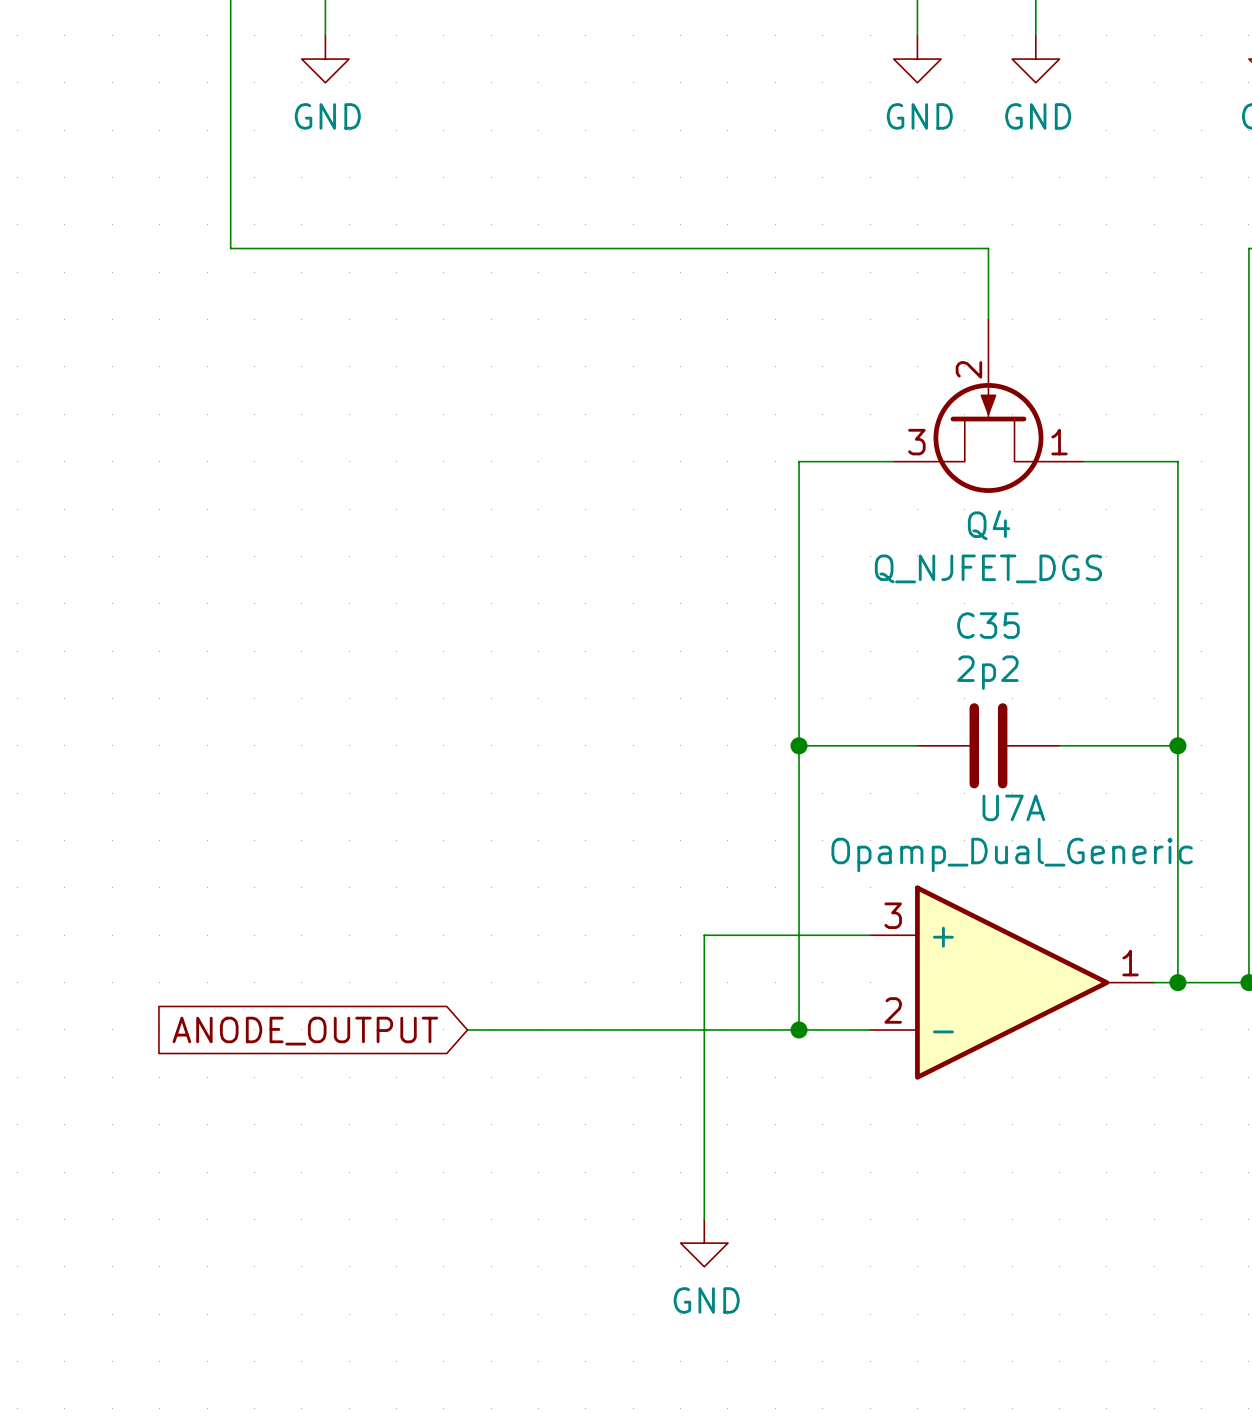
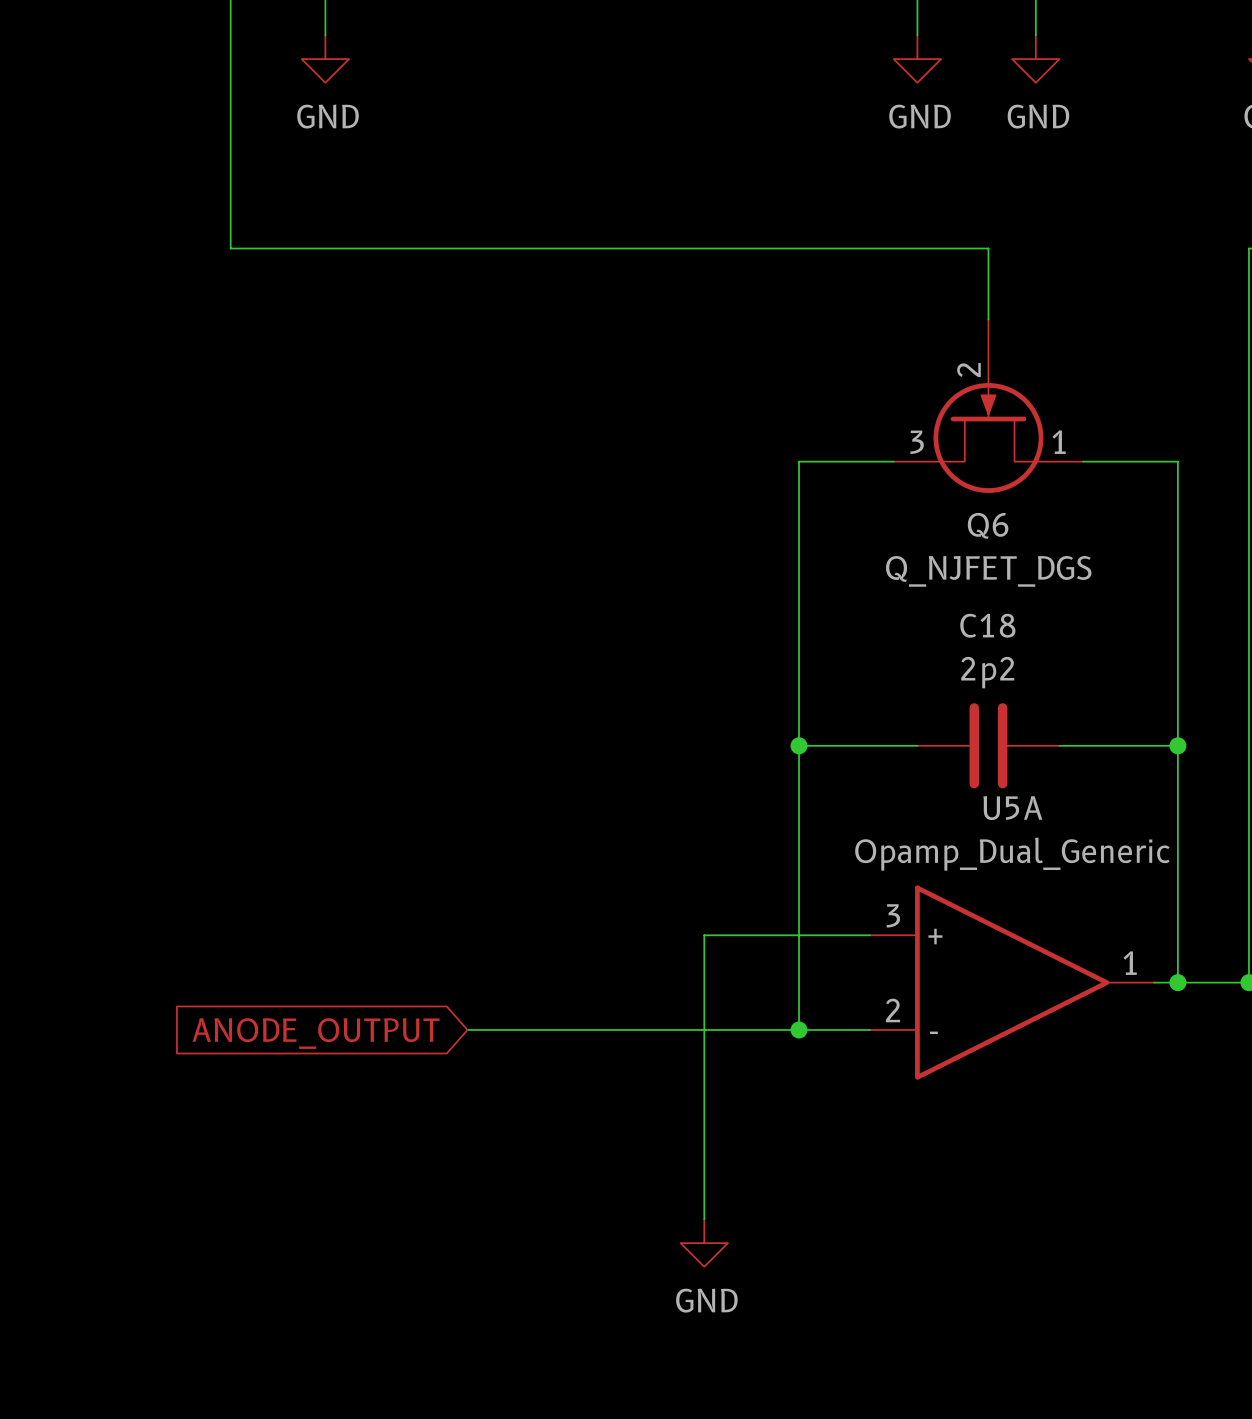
Q4 name: Q4 (989, 525) -> Q6 (988, 525)
C35 name: C35 (988, 625) -> C18 (987, 625)
U7A name: U7A (1013, 807) -> U5A (1012, 808)

